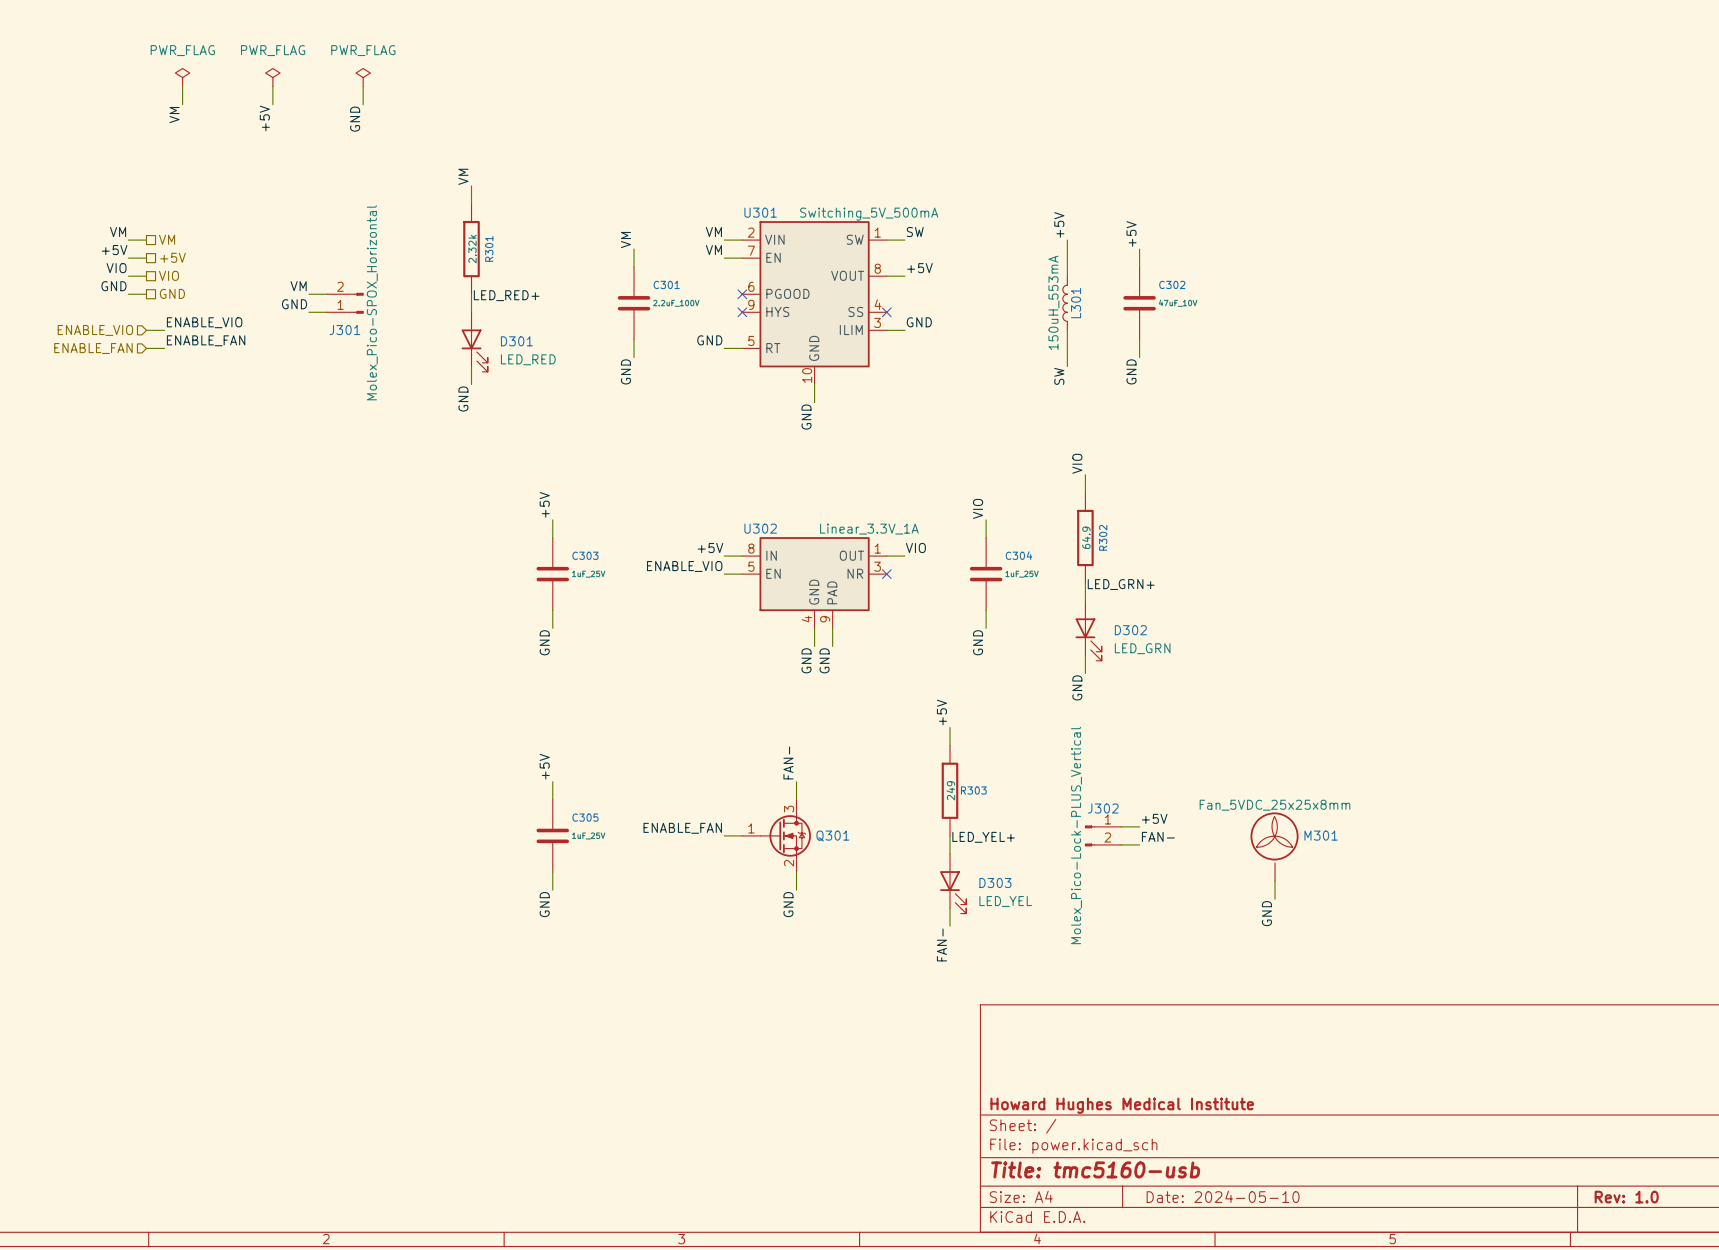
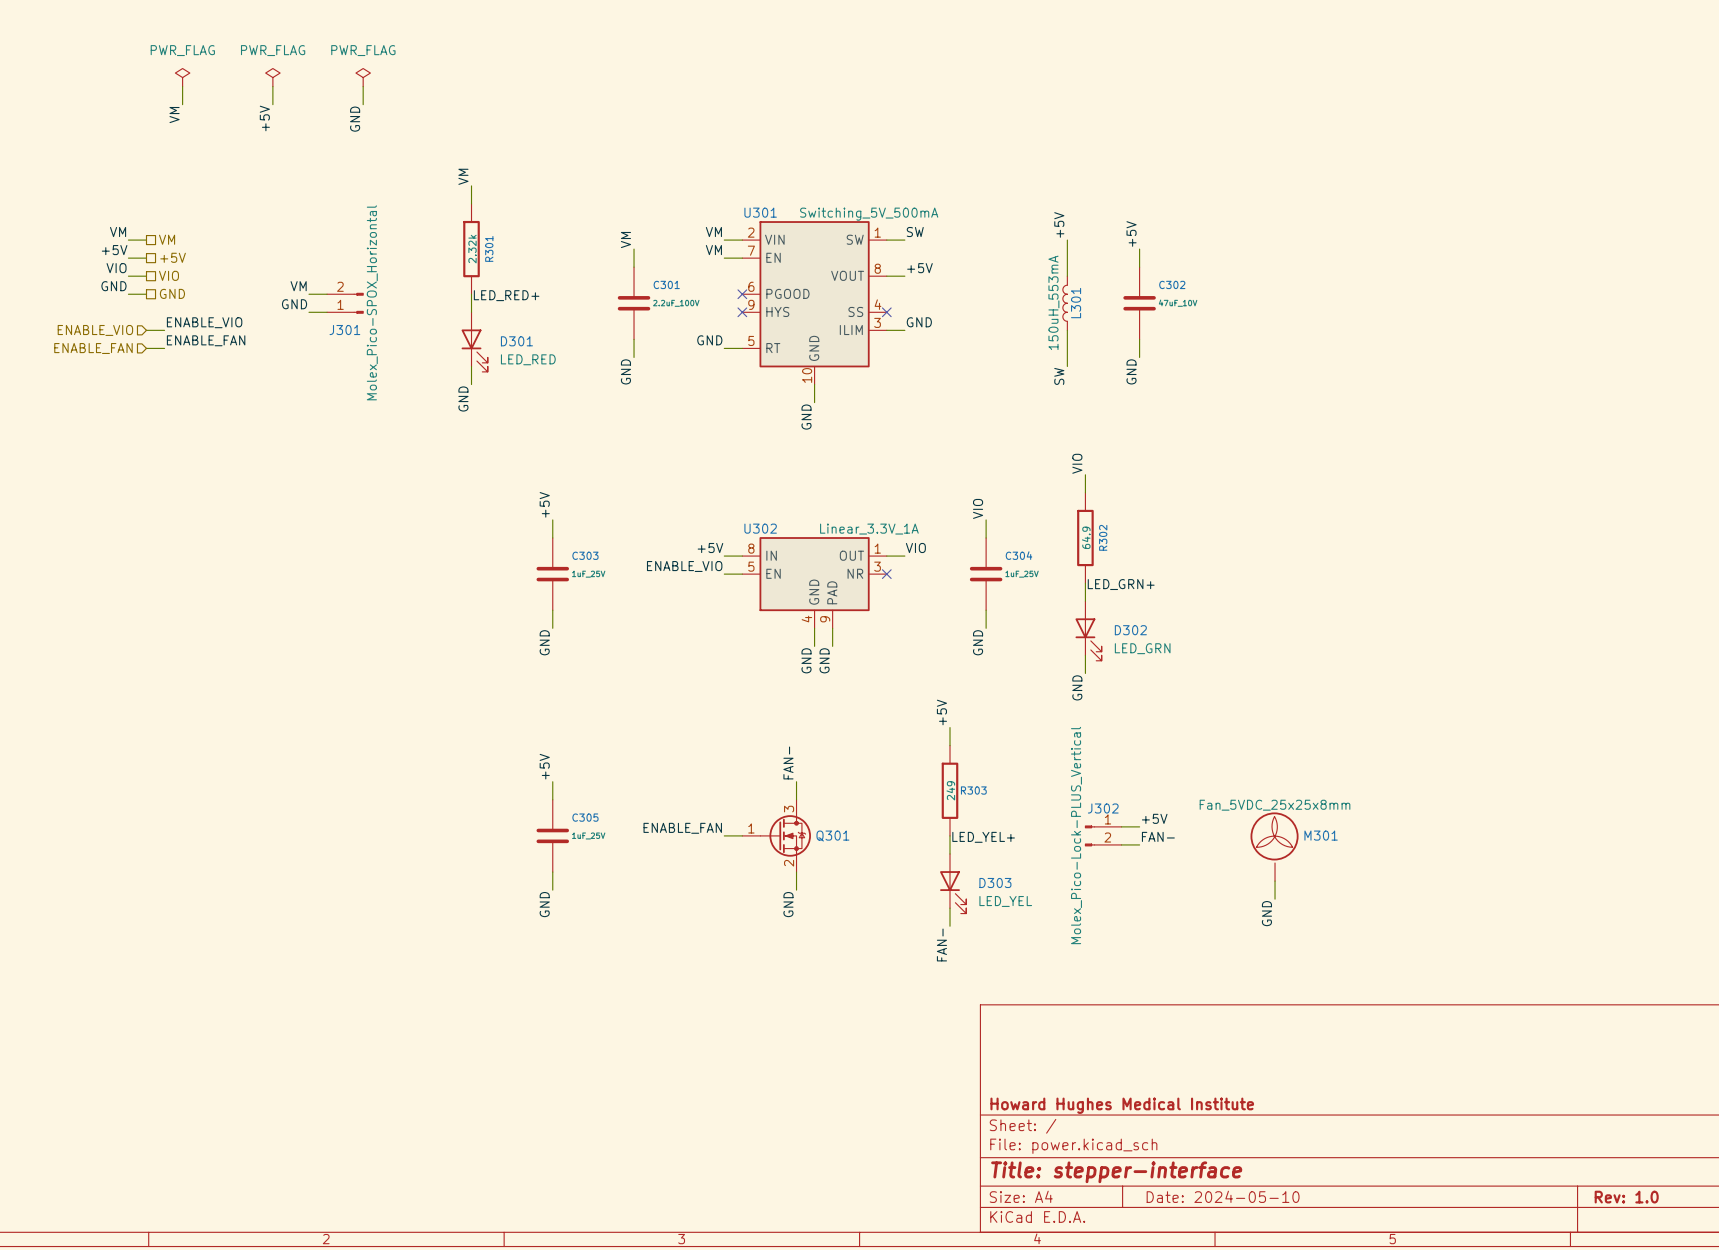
title block: Title: tmc5160-usb (1095, 1169) -> Title: stepper-interface (1116, 1172)

